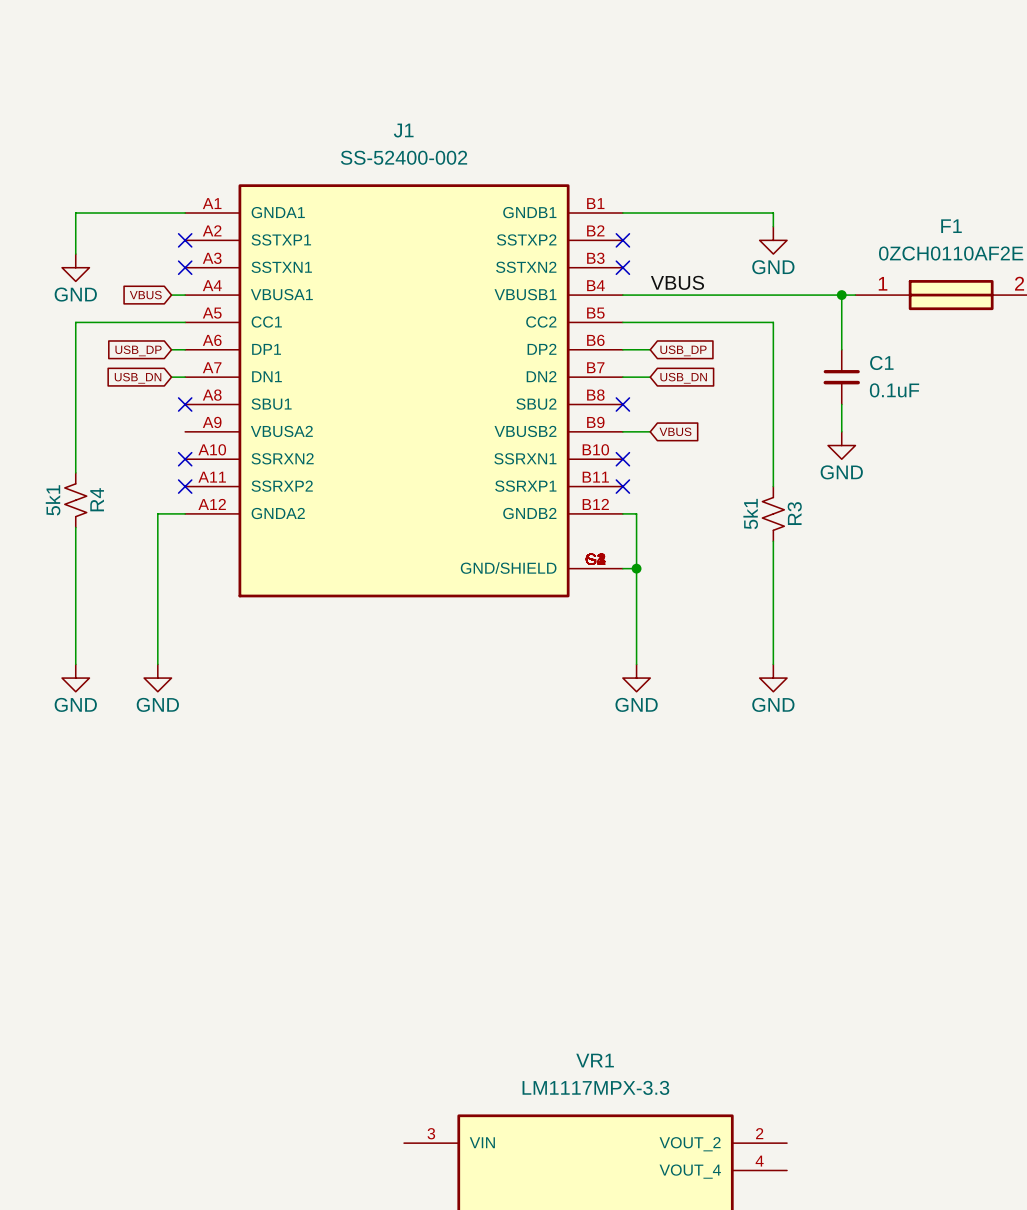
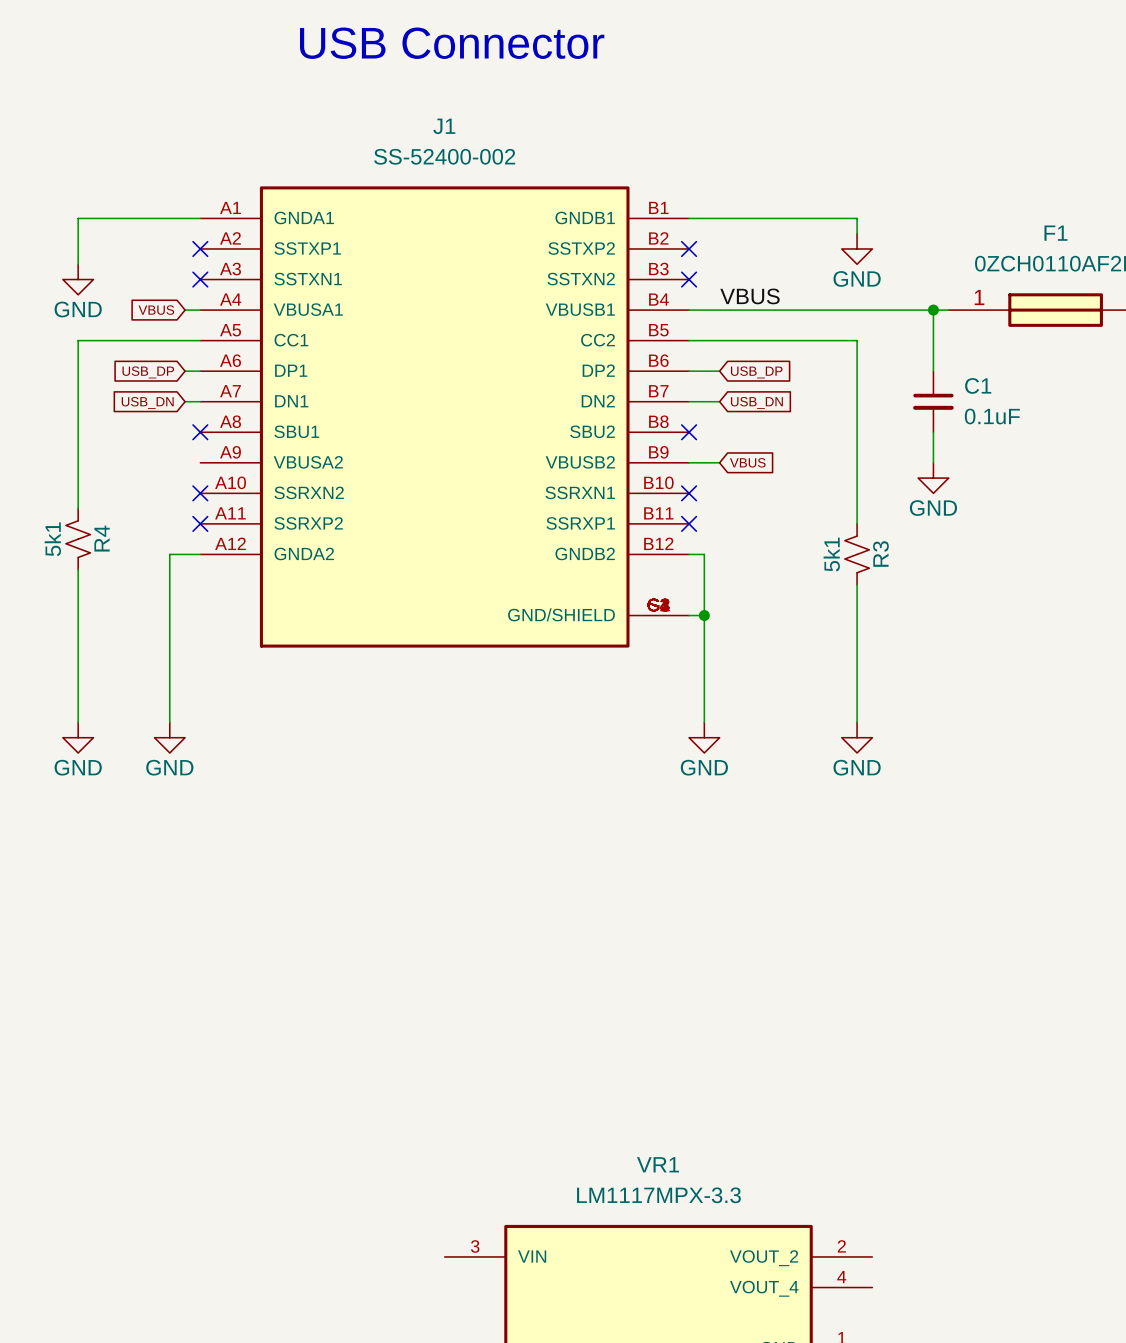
text: none -> USB Connector (452, 43)

